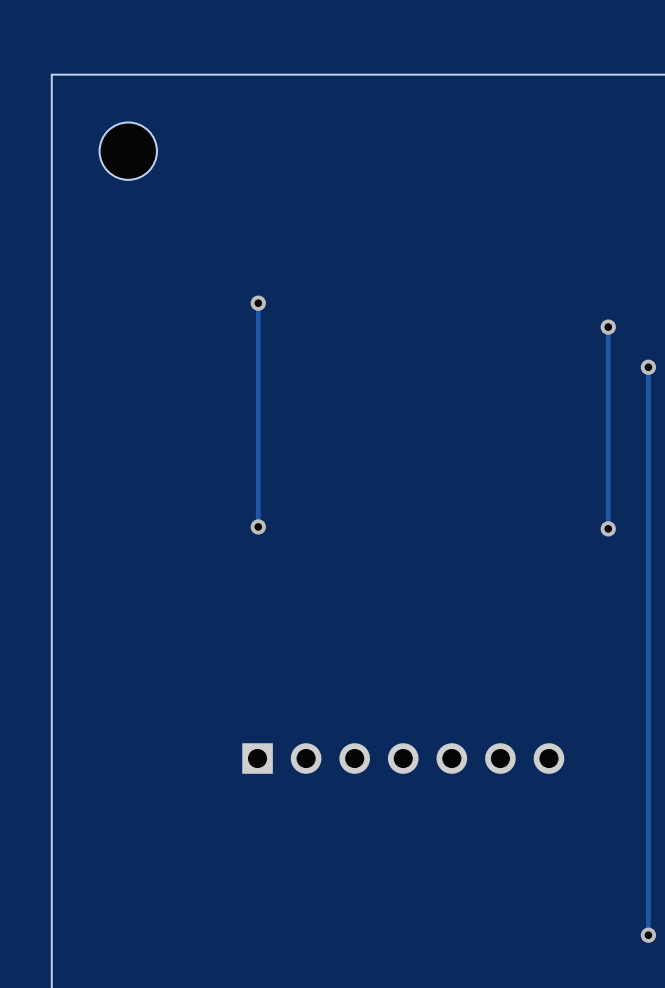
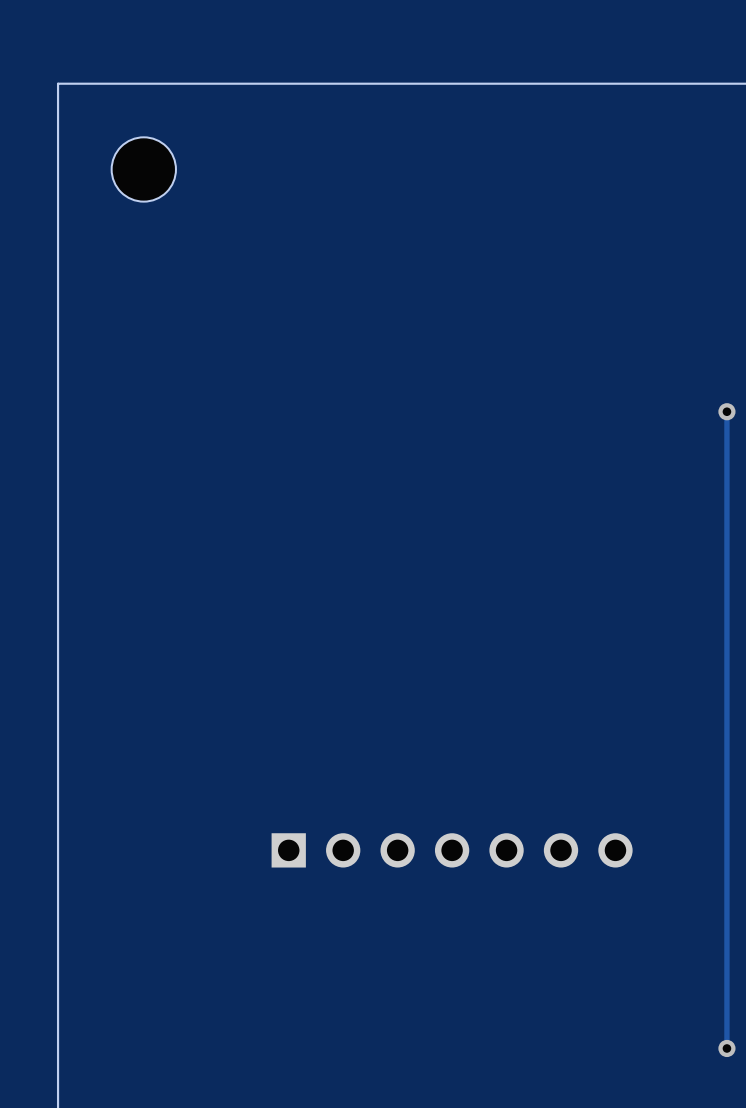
track: (258, 303) (258, 526) -> none
via: (258, 303) -> none
track: (608, 327) (608, 528) -> none
via: (608, 327) -> none
via: (258, 526) -> none
via: (608, 528) -> none

